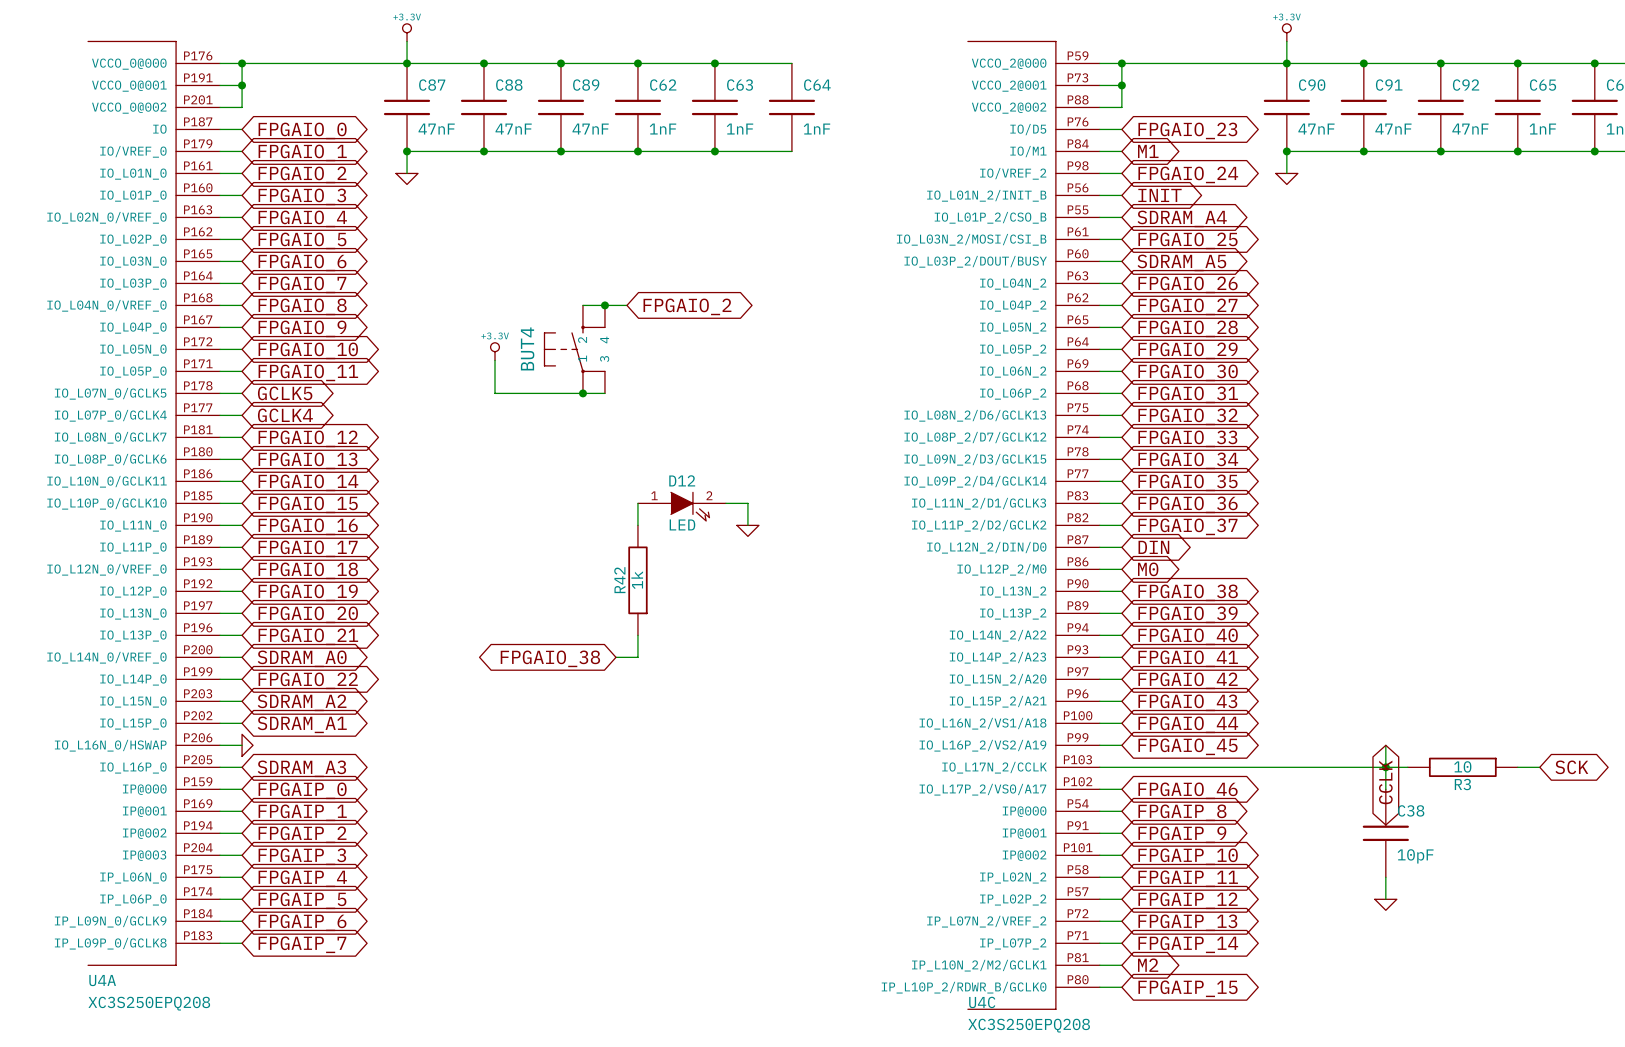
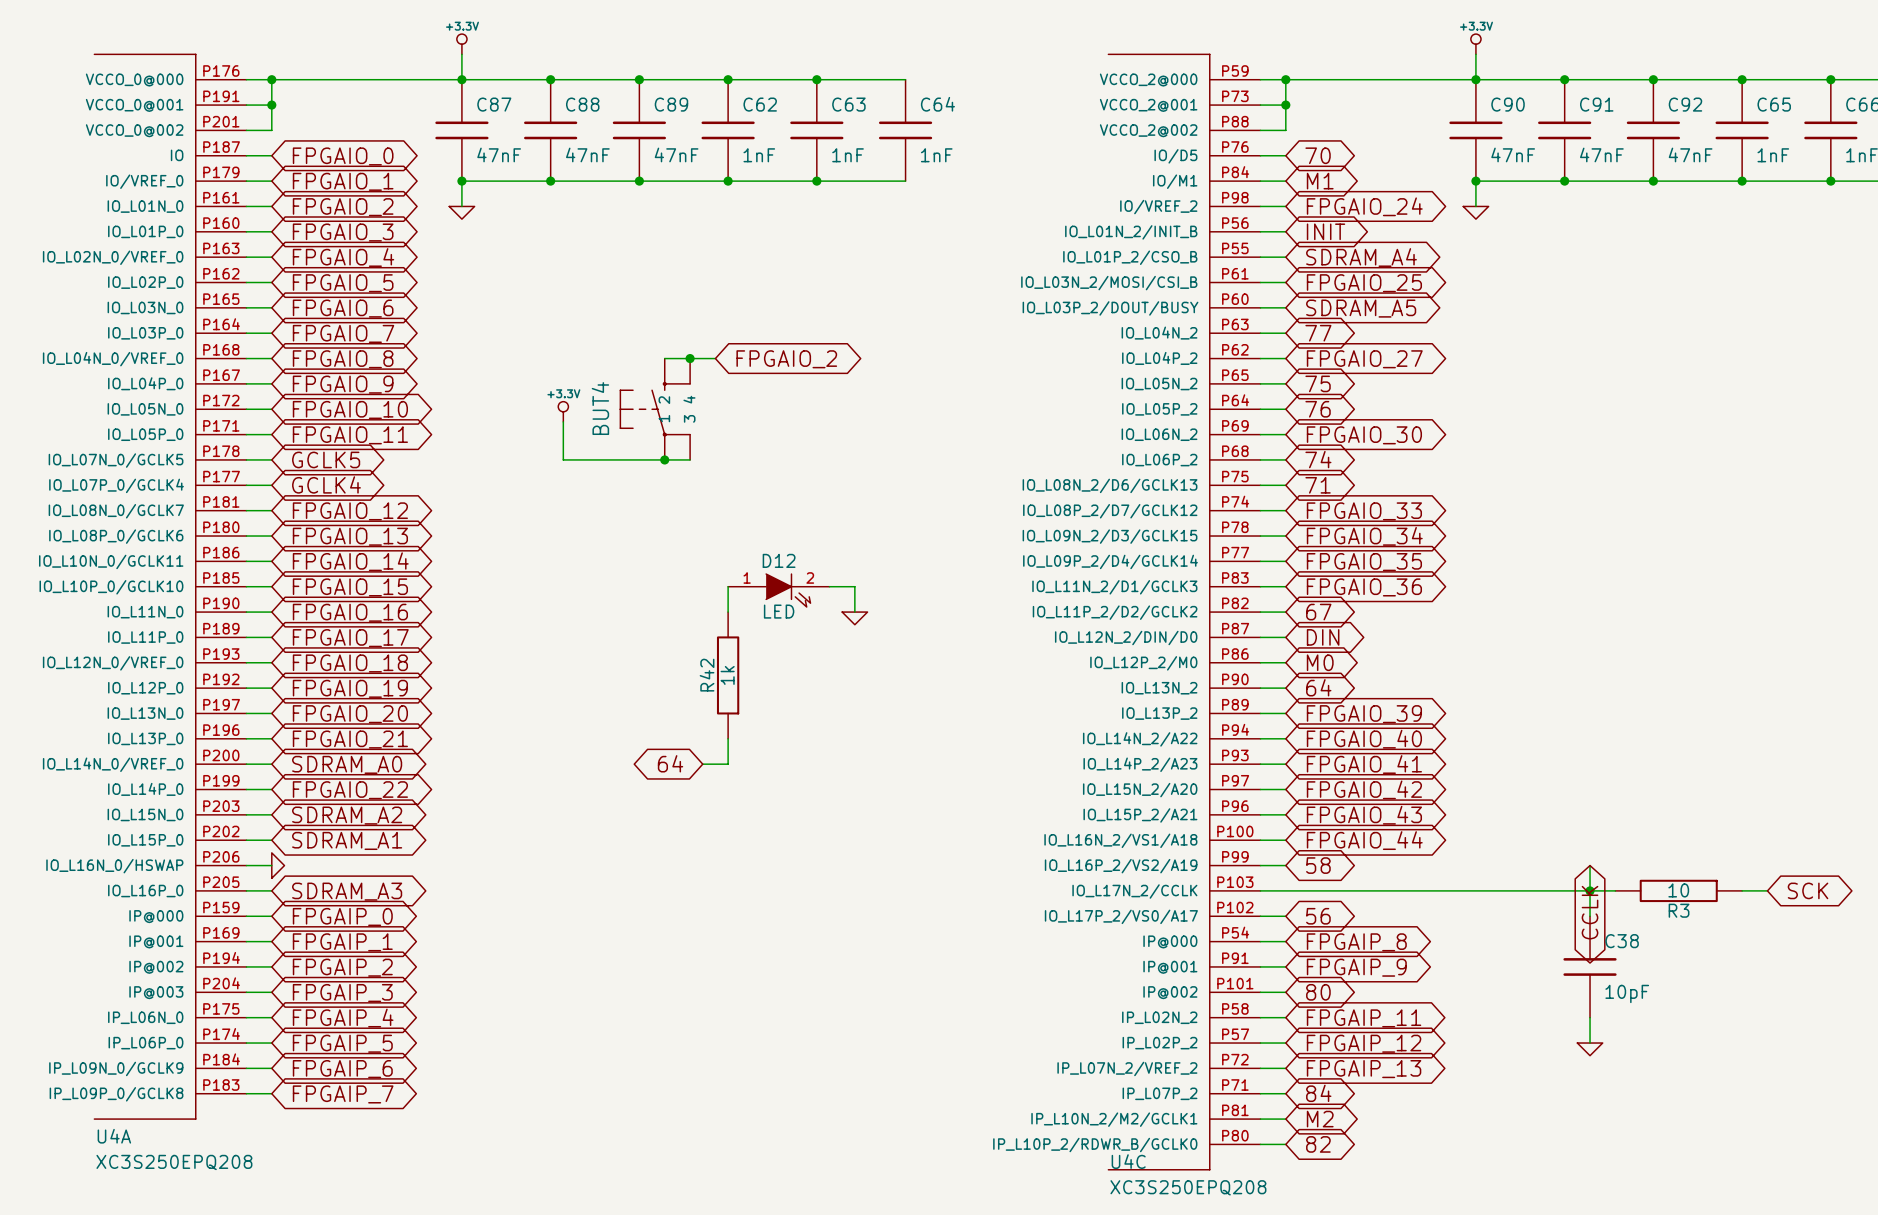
global label: FPGAIO_23 (1187, 130) -> 70 (1318, 155)
global label: FPGAIO_26 (1188, 284) -> 77 (1318, 333)
global label: FPGAIO_28 (1188, 328) -> 75 (1318, 383)
global label: FPGAIO_29 (1188, 350) -> 76 (1318, 409)
global label: FPGAIO_31 (1188, 394) -> 74 (1318, 459)
global label: FPGAIO_32 (1188, 416) -> 71 (1318, 485)
global label: FPGAIO_37 (1187, 526) -> 67 (1318, 612)
global label: FPGAIO_38 (1188, 592) -> 64 (1318, 687)
global label: FPGAIO_38 (550, 658) -> 64 (670, 763)
global label: FPGAIO_45 (1188, 746) -> 58 (1318, 865)
global label: FPGAIO_46 (1188, 790) -> 56 (1318, 916)
global label: FPGAIP_10 (1188, 856) -> 80 (1318, 992)
global label: FPGAIP_14 (1188, 944) -> 84 (1318, 1093)
global label: FPGAIP_15 (1188, 988) -> 82 (1318, 1144)

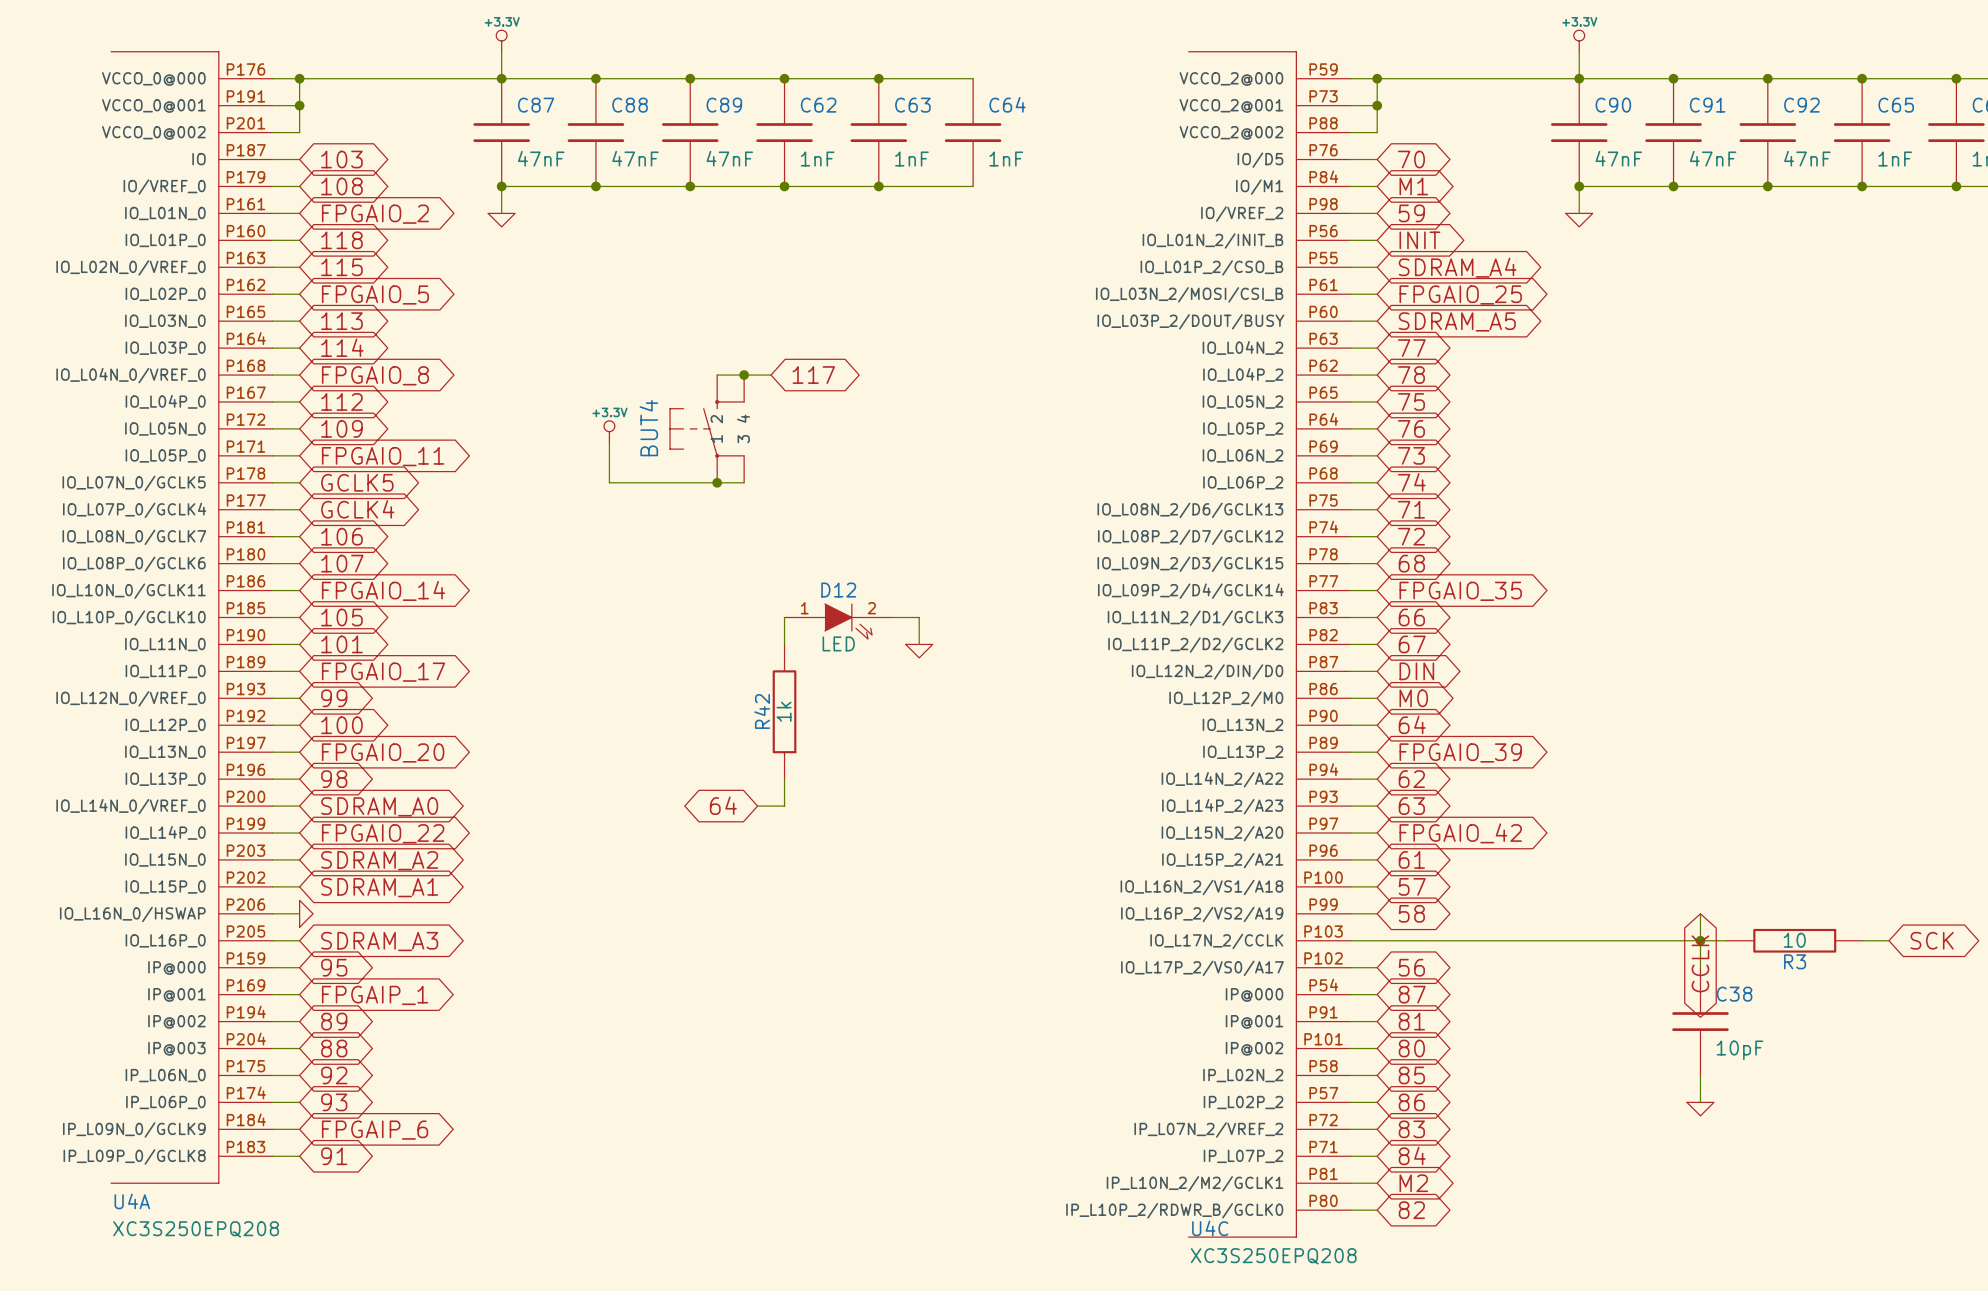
global label: FPGAIO_0 (343, 156) -> 103 (341, 159)
global label: FPGAIO_1 (343, 181) -> 108 (341, 186)
global label: FPGAIO_24 (1364, 206) -> 59 (1411, 213)
global label: FPGAIO_3 (343, 232) -> 118 (341, 240)
global label: FPGAIO_4 (343, 257) -> 115 (341, 267)
global label: FPGAIO_6 (343, 308) -> 113 (341, 321)
global label: FPGAIO_7 (343, 333) -> 114 (342, 347)
global label: FPGAIO_2 (786, 359) -> 117 (813, 375)
global label: FPGAIO_27 (1364, 359) -> 78 (1411, 375)
global label: FPGAIO_9 (343, 384) -> 112 (341, 401)
global label: FPGAIO_10 (350, 409) -> 109 (341, 428)
global label: FPGAIO_30 (1364, 435) -> 73 (1411, 455)
global label: FPGAIO_12 (350, 511) -> 106 (341, 536)
global label: FPGAIO_33 (1364, 511) -> 72 (1411, 536)
global label: FPGAIO_13 (350, 536) -> 107 (342, 563)
global label: FPGAIO_34 (1364, 536) -> 68 (1411, 563)
global label: FPGAIO_15 (350, 587) -> 105 (341, 617)
global label: FPGAIO_36 (1364, 587) -> 66 (1411, 617)
global label: FPGAIO_16 (350, 612) -> 101 (341, 644)
global label: FPGAIO_18 (350, 663) -> 99 (334, 698)
global label: FPGAIO_19 (350, 688) -> 100 (341, 725)
global label: FPGAIO_21 (350, 739) -> 98 (334, 779)
global label: FPGAIO_40 (1364, 739) -> 62 (1411, 779)
global label: FPGAIO_41 (1364, 764) -> 63 (1411, 806)
global label: FPGAIO_43 (1364, 815) -> 61 (1411, 859)
global label: FPGAIO_44 (1364, 840) -> 57 (1412, 886)
global label: FPGAIP_0 (342, 916) -> 95 (334, 967)
global label: FPGAIP_8 (1356, 942) -> 87 (1412, 994)
global label: FPGAIP_2 (342, 967) -> 89 (334, 1021)
global label: FPGAIP_9 (1356, 967) -> 81 (1411, 1021)
global label: FPGAIP_3 (342, 993) -> 88 (334, 1048)
global label: FPGAIP_4 (343, 1018) -> 92 (334, 1075)
global label: FPGAIP_11 (1364, 1018) -> 85 (1411, 1075)
global label: FPGAIP_5 (342, 1043) -> 93 (334, 1102)
global label: FPGAIP_12 (1364, 1043) -> 86 (1411, 1102)
global label: FPGAIP_13 (1364, 1069) -> 83 (1411, 1129)
global label: FPGAIP_7 (343, 1094) -> 91 (334, 1156)

